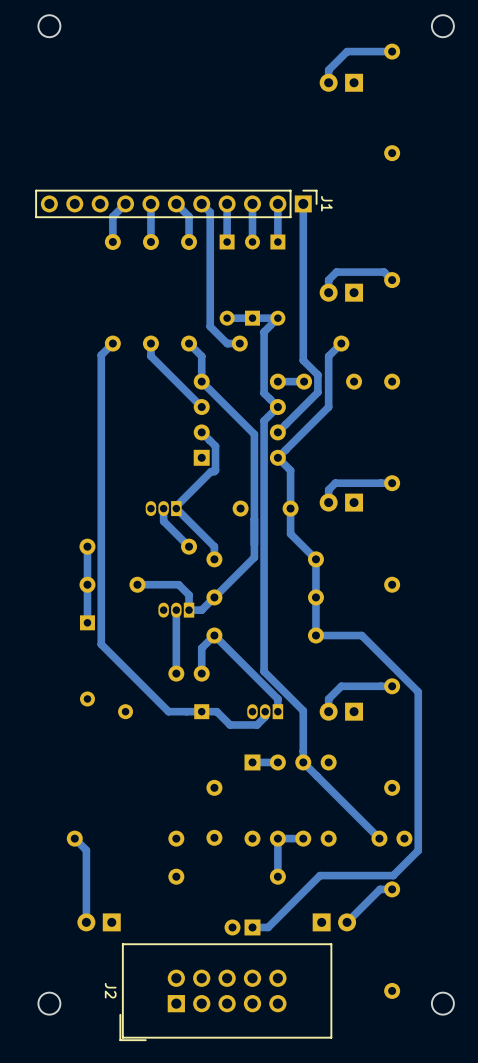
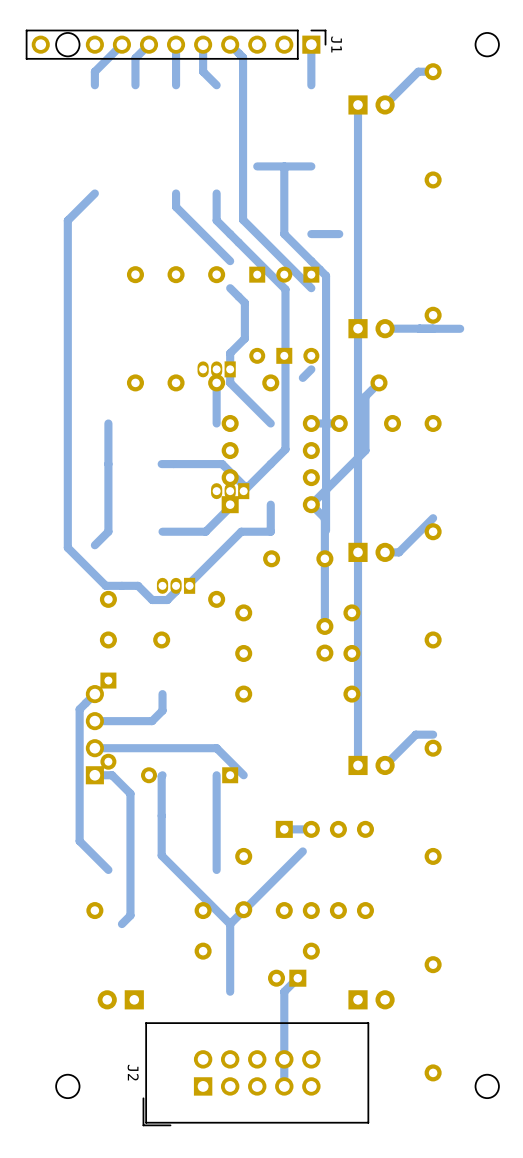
track: none -> (121, 44) (94, 71) (94, 85)
track: none -> (203, 44) (203, 71) (216, 85)
track: none -> (230, 44) (243, 57) (243, 219) (311, 288)
track: (378, 51) (347, 51) (328, 70) (328, 82) -> (418, 71) (385, 104)
track: none -> (358, 104) (358, 765)
part rotation: 0° (341, 82) -> 180° (371, 104)
track: none -> (284, 166) (284, 234) (326, 275) (326, 530)
track: none -> (311, 166) (257, 166)
track: none -> (94, 193) (67, 220) (67, 547) (105, 585) (138, 585) (152, 600) (167, 600) (176, 591) (176, 585)
track: none -> (176, 193) (176, 207) (203, 234)
track: none -> (216, 193) (216, 220) (230, 234)
track: (125, 203) (112, 216) (112, 242) -> (149, 44) (135, 58) (135, 85)
track: (150, 203) (150, 242) -> (176, 44) (176, 85)
J1 position: (176, 203) -> (176, 44)
track: (227, 203) (227, 242) -> none
track: (252, 203) (252, 242) -> (311, 44) (311, 85)
track: (277, 203) (277, 242) -> (311, 234) (339, 234)
track: (303, 203) (303, 360) (317, 375) (317, 392) (277, 432) -> none
track: (210, 212) (210, 326) (227, 343) (239, 343) -> (239, 243) (285, 289) (285, 449) (243, 491) (243, 485) (222, 464) (161, 464)
track: (189, 216) (189, 242) -> (216, 247) (230, 261)
track: none -> (230, 288) (244, 302) (244, 338) (230, 353) (230, 382) (270, 423)
track: (392, 280) (384, 272) (336, 272) (328, 279) (328, 292) -> none
part rotation: 0° (341, 292) -> 180° (371, 328)
track: none -> (433, 328) (385, 328)
track: none -> (460, 328) (419, 328)
track: (227, 318) (277, 318) (264, 331) (264, 393) (277, 407) (264, 420) (264, 671) (303, 710) (303, 762) (379, 838) -> none
track: none -> (216, 369) (216, 423)
part: none -> (216, 369)
track: none -> (311, 369) (302, 377)
track: (112, 343) (101, 355) (101, 644) (168, 711) (216, 711) (230, 724) (257, 724) (265, 716) (265, 711) -> none
track: (150, 343) (150, 356) (201, 407) -> none
track: (189, 343) (201, 356) (201, 381) (254, 434) (254, 557) (201, 610) (189, 610) (189, 595) (178, 584) (137, 584) -> none
track: none -> (108, 423) (108, 531) (94, 545)
track: (201, 432) (215, 446) (215, 470) (211, 471) (176, 506) (176, 508) (214, 546) (214, 559) -> none
track: none -> (230, 491) (230, 507) (205, 531) (162, 531)
part: none -> (230, 491)
track: none -> (270, 504) (270, 531) (241, 531) (189, 583) (189, 585)
track: none -> (433, 518) (398, 552) (385, 552)
track: (392, 483) (335, 483) (328, 489) (328, 502) -> none
part rotation: 0° (341, 502) -> 180° (371, 552)
track: (163, 508) (163, 521) (189, 546) -> none
part position: (163, 508) -> (176, 585)
track: (290, 533) (315, 559) (315, 635) (361, 635) (418, 691) (418, 850) (393, 875) (320, 875) (268, 927) (252, 927) -> (324, 585) (324, 626)
track: (87, 546) (87, 622) -> none
part: none -> (324, 639)
track: (176, 610) (176, 673) -> (230, 924) (230, 991)
part: (176, 610) -> none
track: none -> (94, 694) (79, 709) (79, 841) (108, 869)
track: none -> (162, 694) (162, 710) (152, 721) (94, 721)
part: none -> (94, 734)
part: (189, 673) -> none
track: (201, 673) (201, 648) (214, 635) (277, 698) (277, 711) -> none
track: none -> (433, 734) (415, 734) (385, 765)
track: none -> (94, 748) (216, 748) (243, 775)
track: (392, 686) (341, 686) (328, 698) (328, 711) -> none
track: none -> (94, 775) (112, 775) (130, 793) (130, 915) (121, 924)
track: none -> (162, 775) (161, 855) (230, 924)
track: none -> (216, 775) (216, 869)
part: (265, 711) -> none
part rotation: 0° (341, 711) -> 180° (371, 765)
track: none -> (302, 851) (230, 924)
track: (74, 838) (86, 850) (86, 922) -> none
track: (303, 838) (277, 838) (277, 876) -> none
part: (391, 838) -> none
track: (392, 889) (380, 889) (347, 922) -> none
track: none -> (297, 978) (284, 991) (284, 1086)
part position: (242, 927) -> (287, 978)

